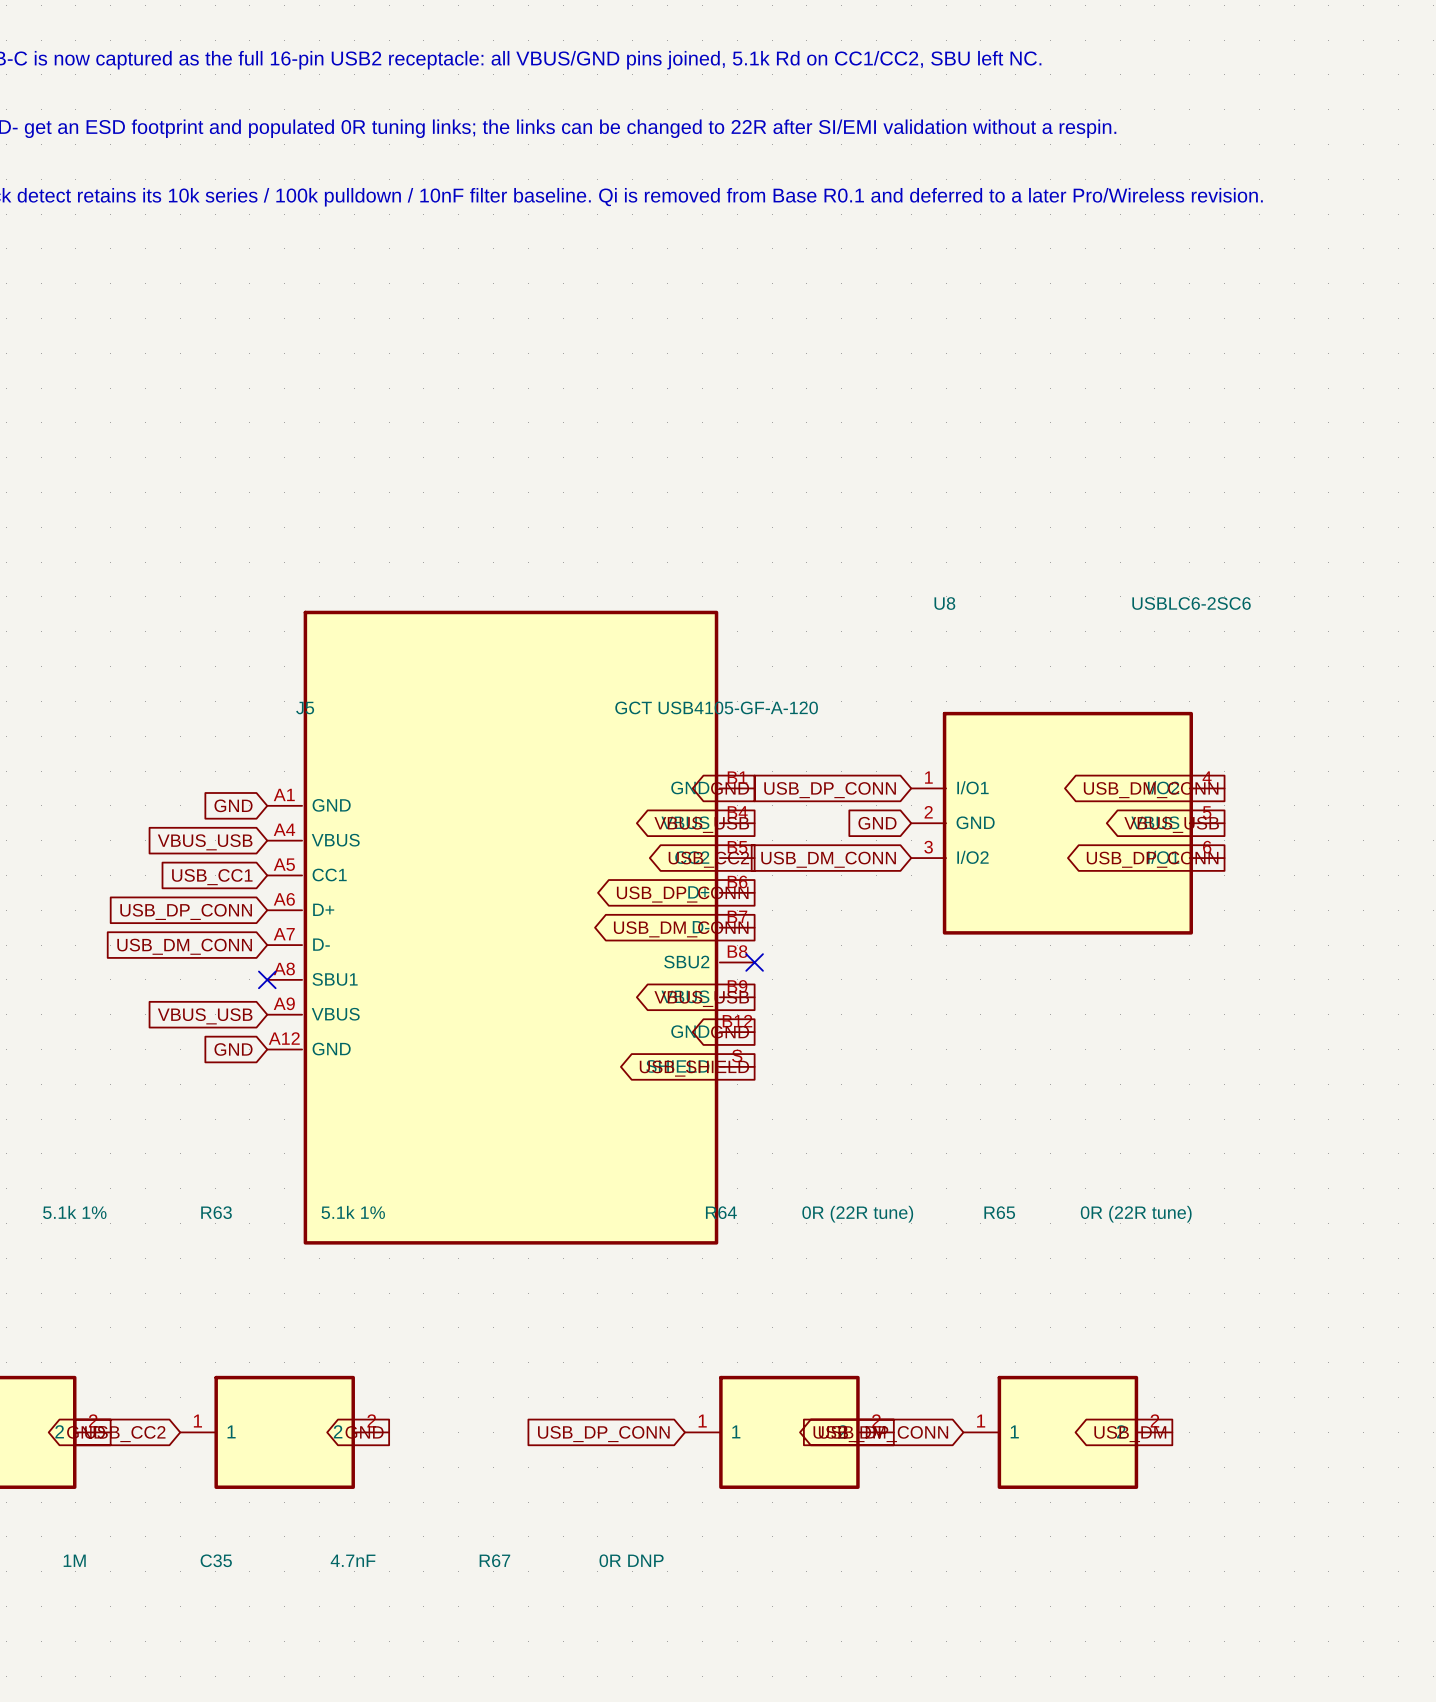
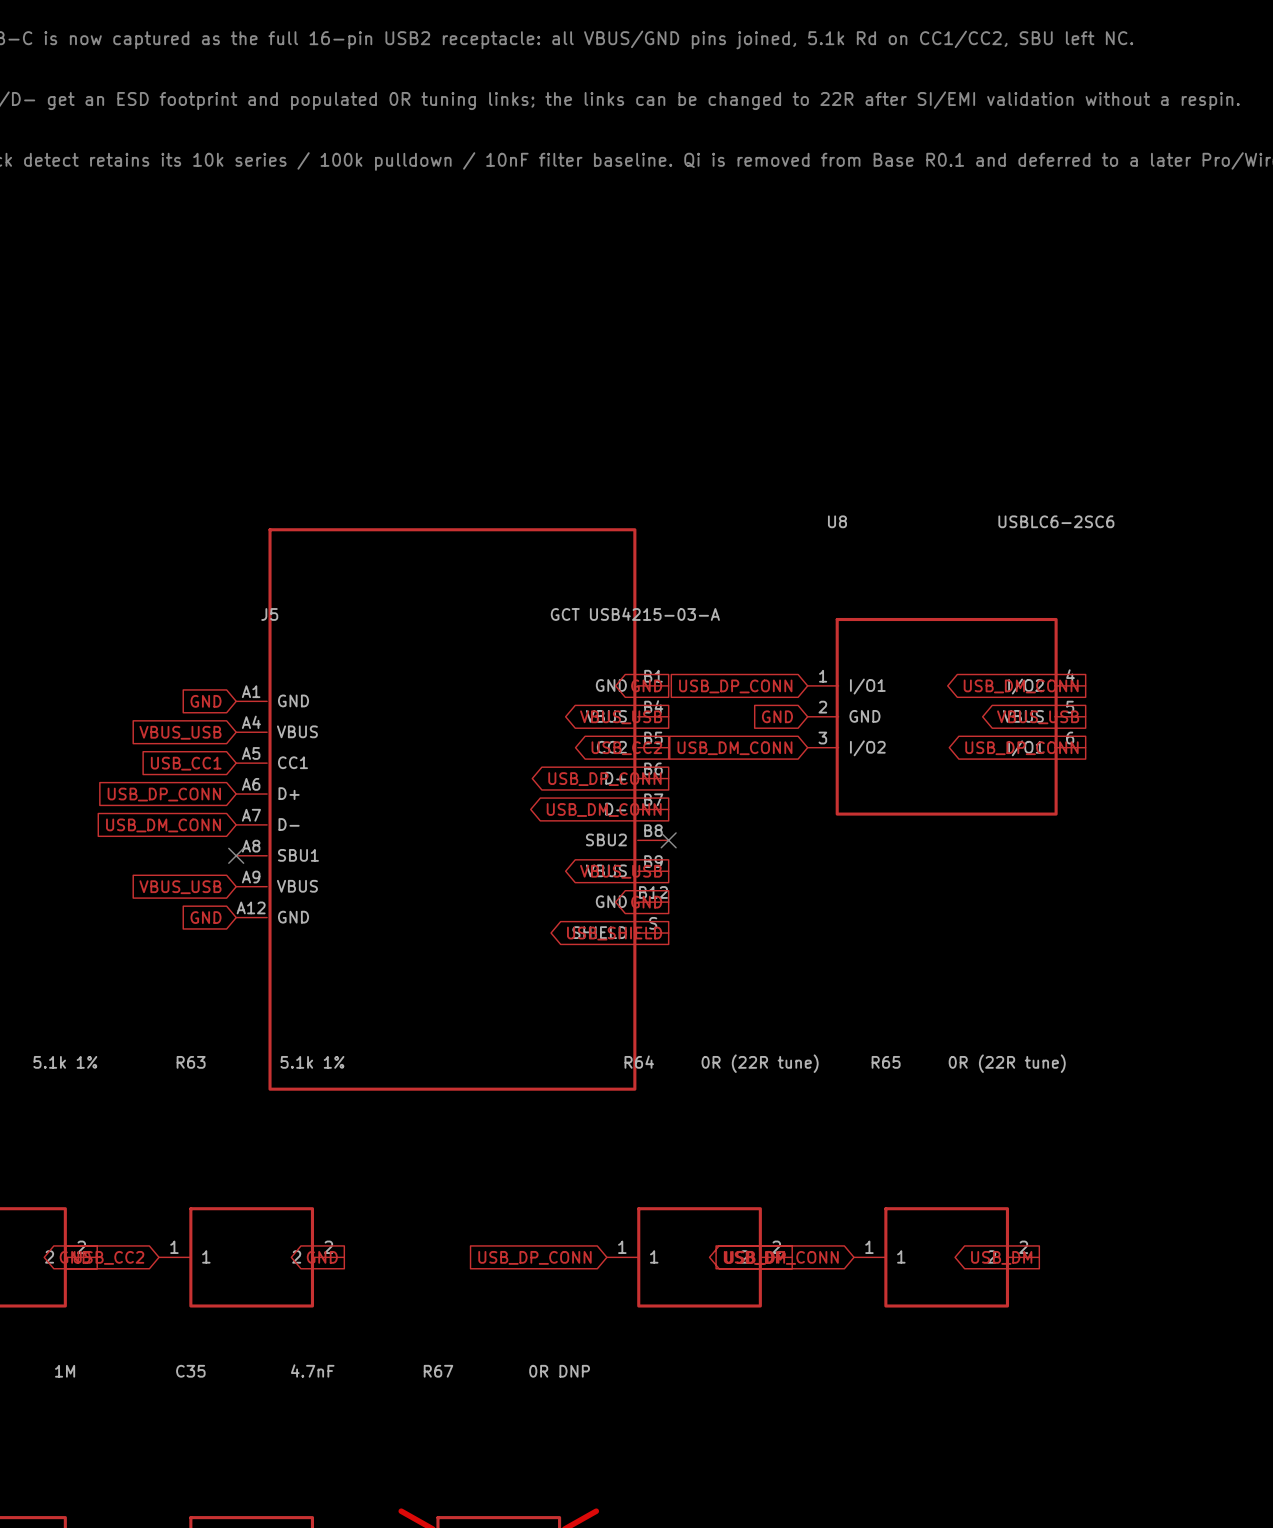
J5 value: GCT USB4105-GF-A-120 (716, 707) -> GCT USB4215-03-A (635, 614)

